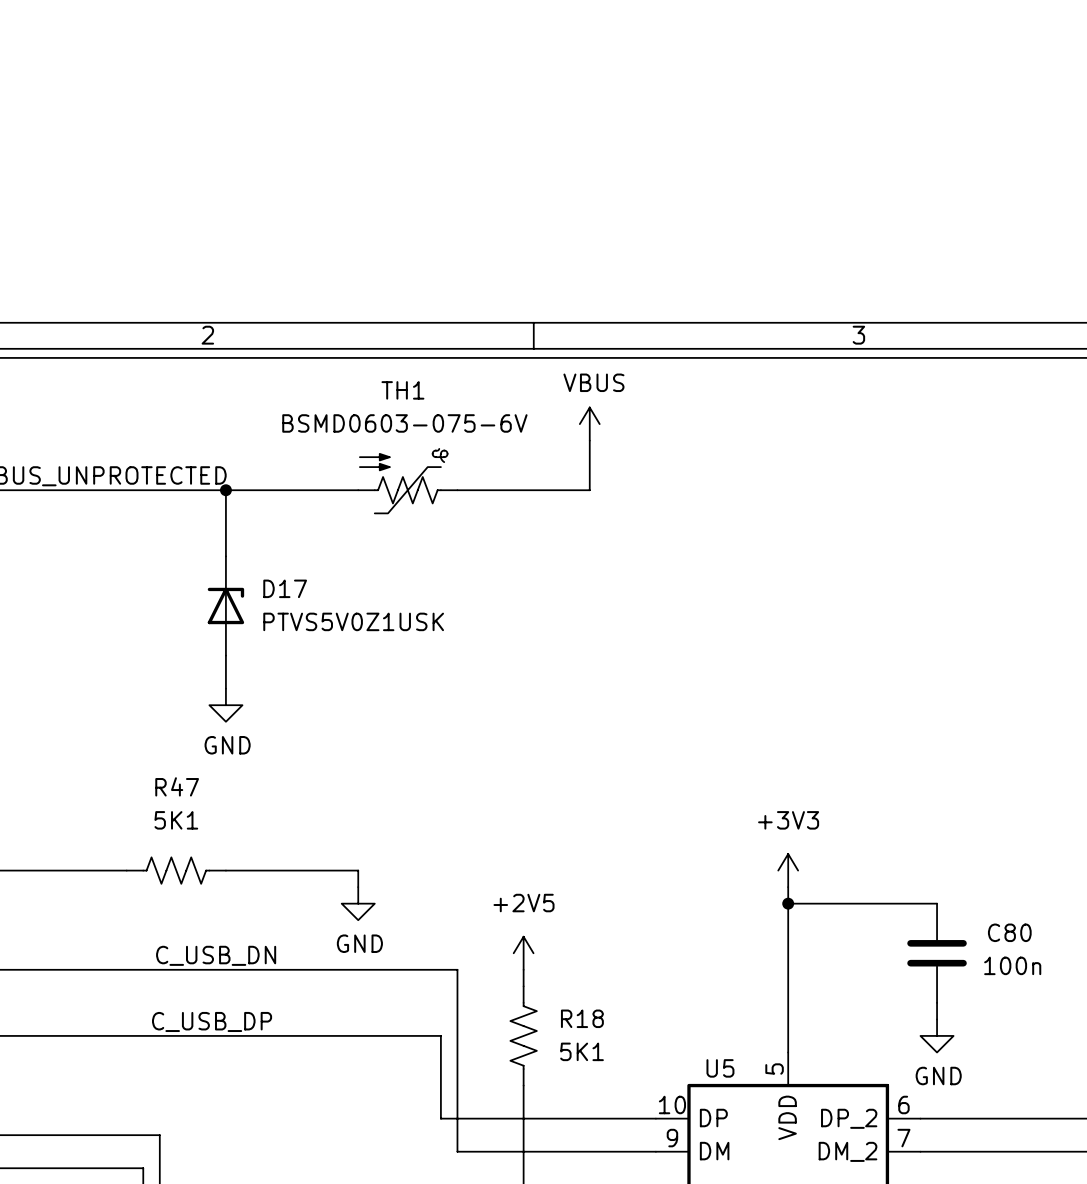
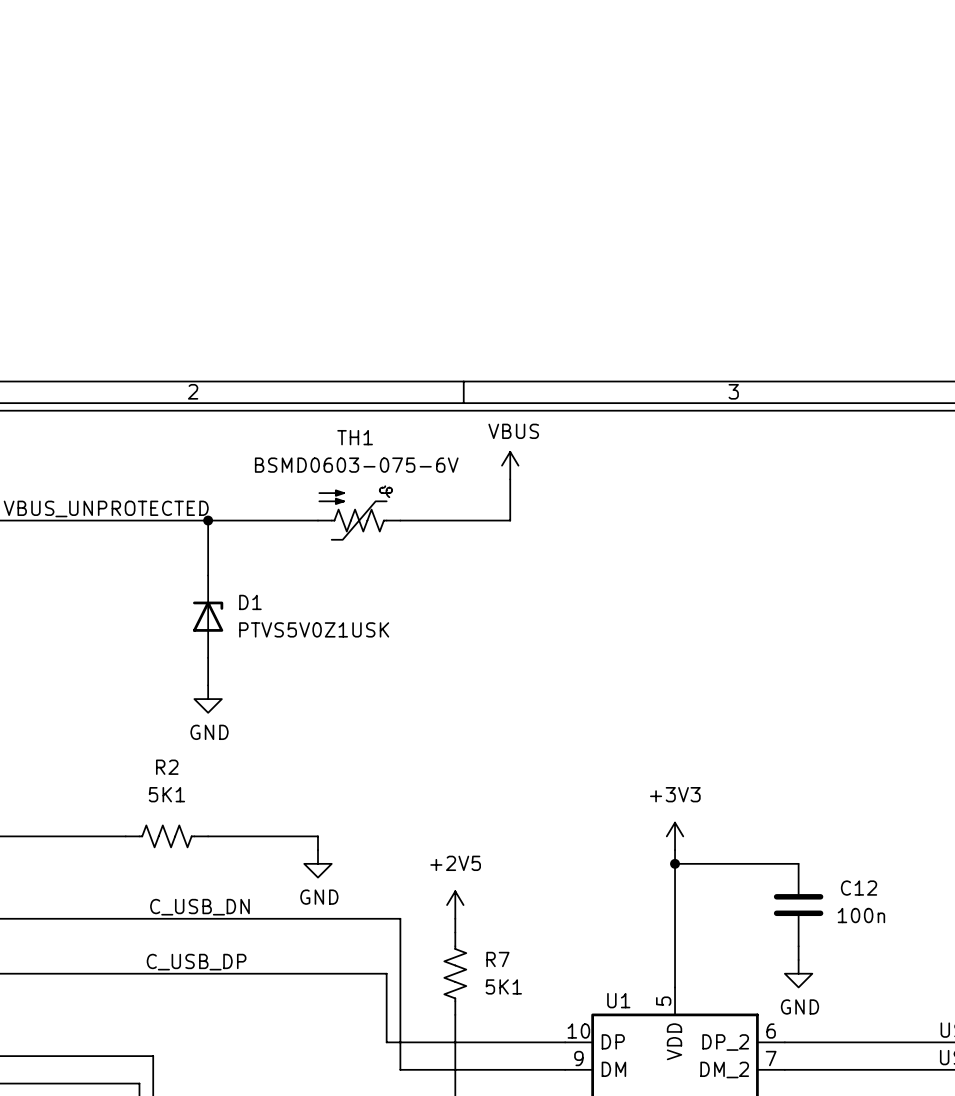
D17 name: D17 (285, 588) -> D1 (250, 602)
R47 name: R47 (177, 786) -> R2 (167, 767)
C80 name: C80 (1009, 932) -> C12 (859, 888)
R18 name: R18 (582, 1018) -> R7 (497, 959)
U5 name: U5 (720, 1068) -> U1 (618, 1000)

